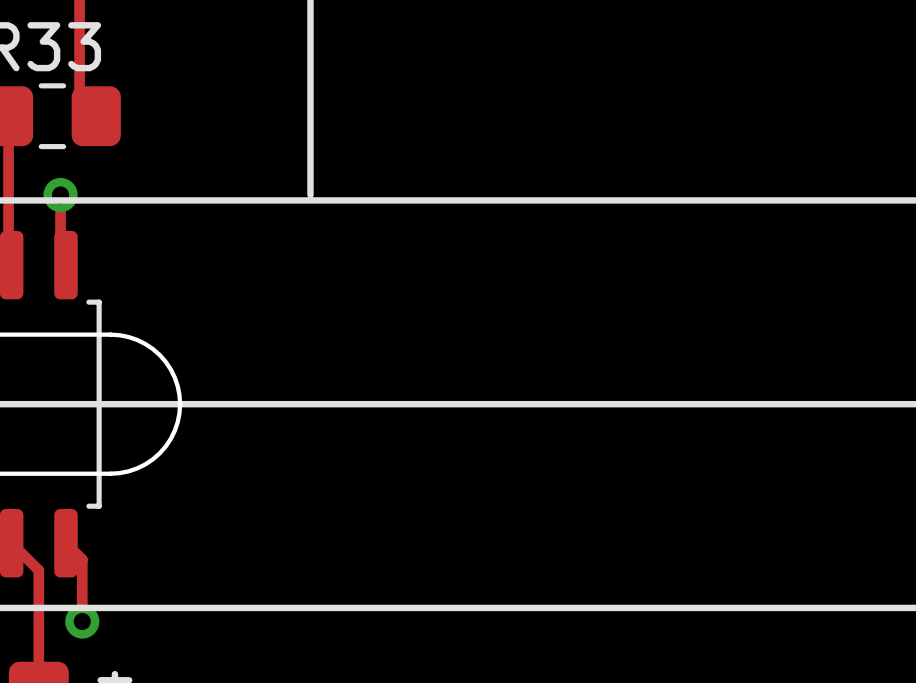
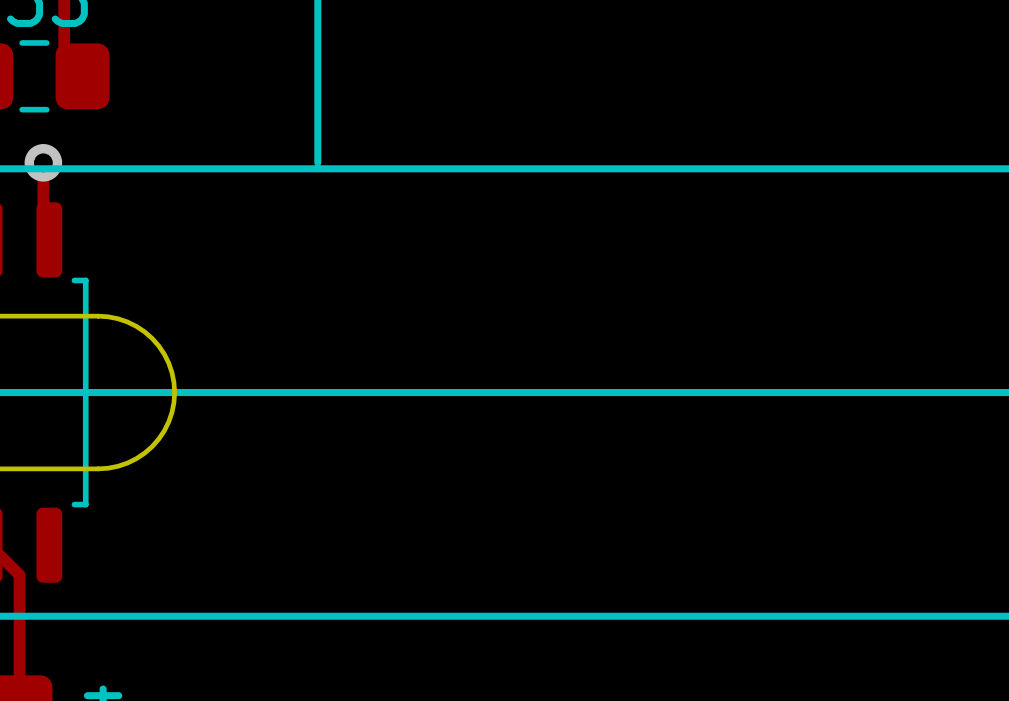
track: (65, 543) (82, 559) (82, 621) -> none
via: (82, 621) -> none

